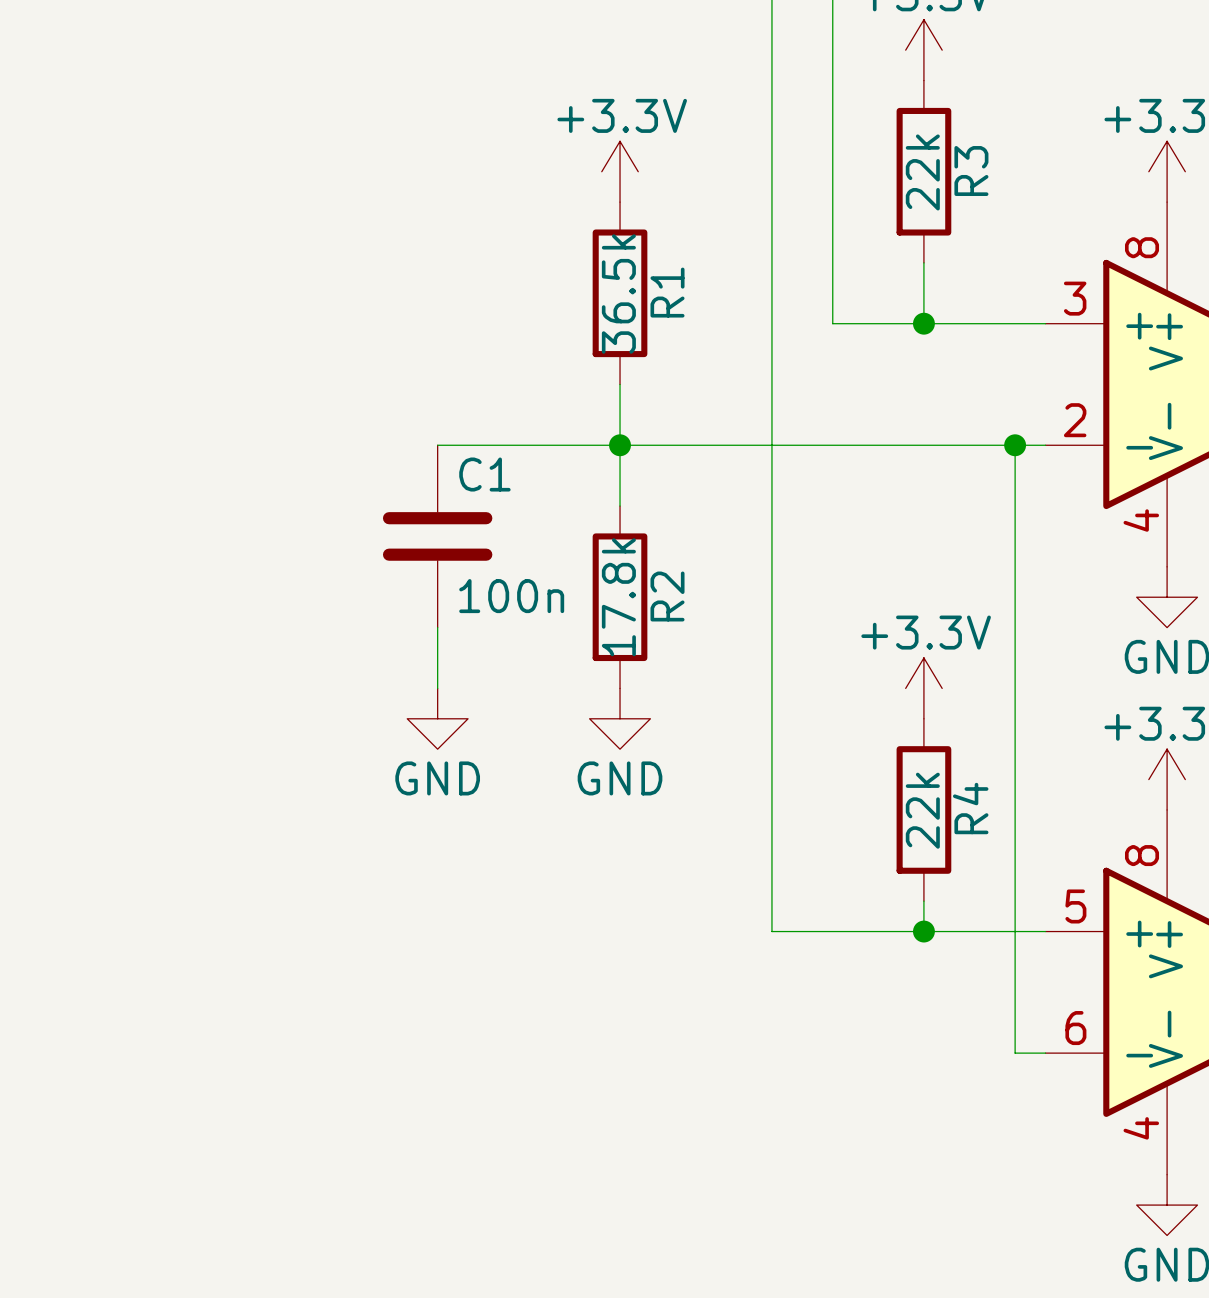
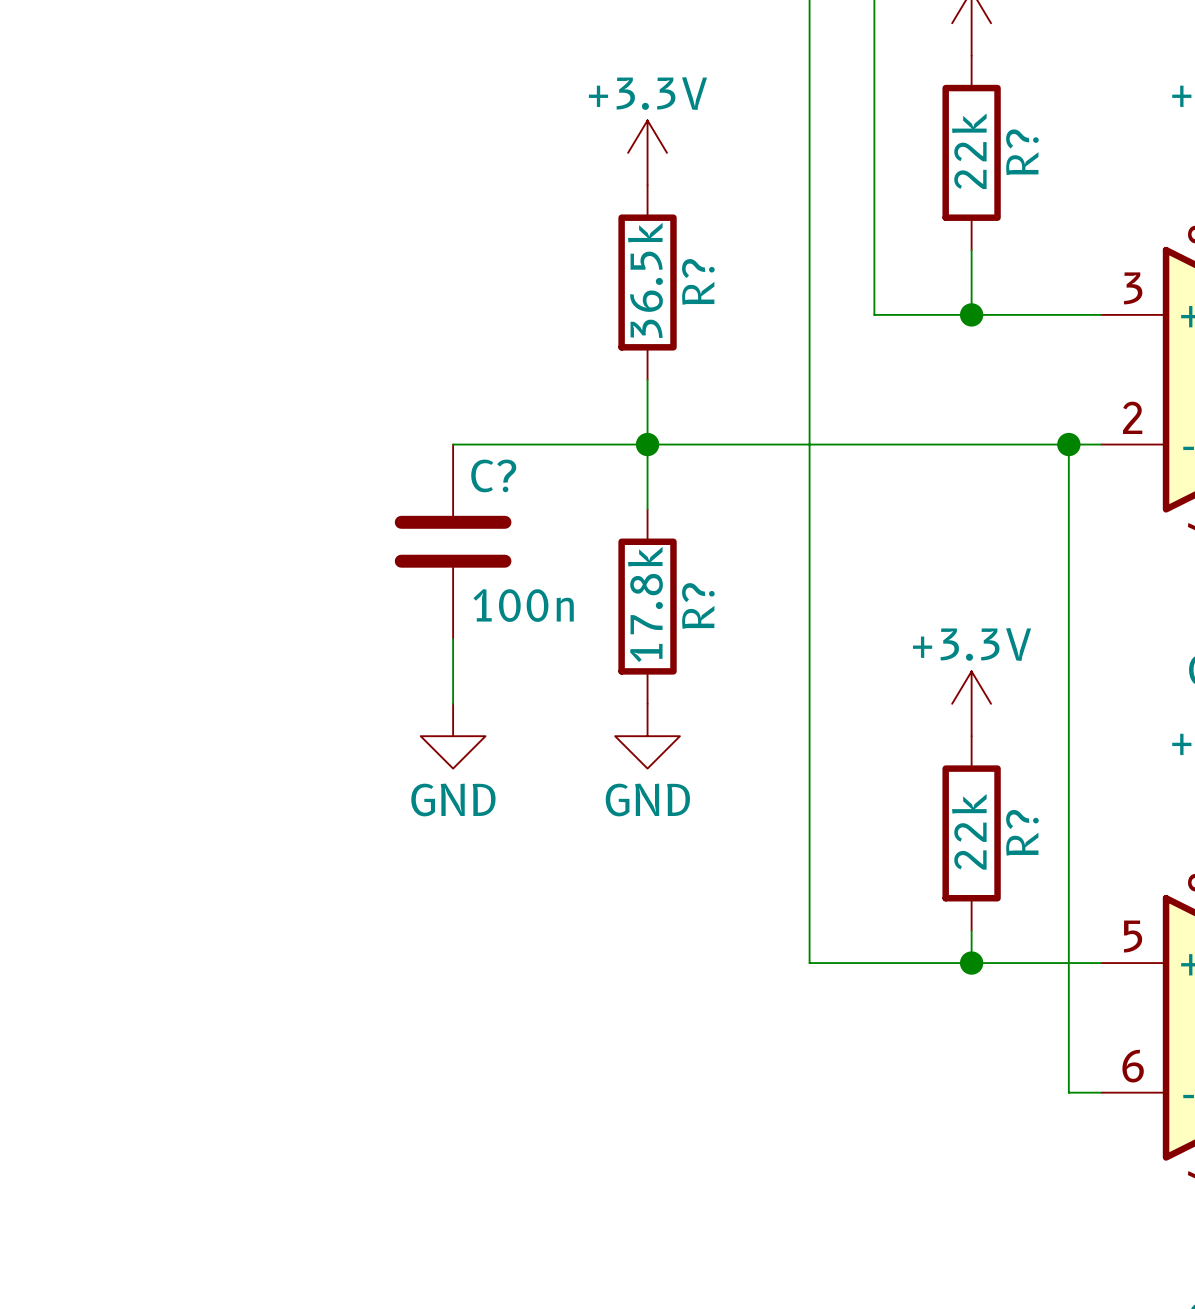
R3 name: R3 (971, 171) -> R? (1022, 152)
R1 name: R1 (667, 292) -> R? (698, 281)
C1 name: C1 (484, 474) -> C? (493, 475)
R2 name: R2 (667, 596) -> R? (698, 605)
R4 name: R4 (970, 808) -> R? (1022, 832)

